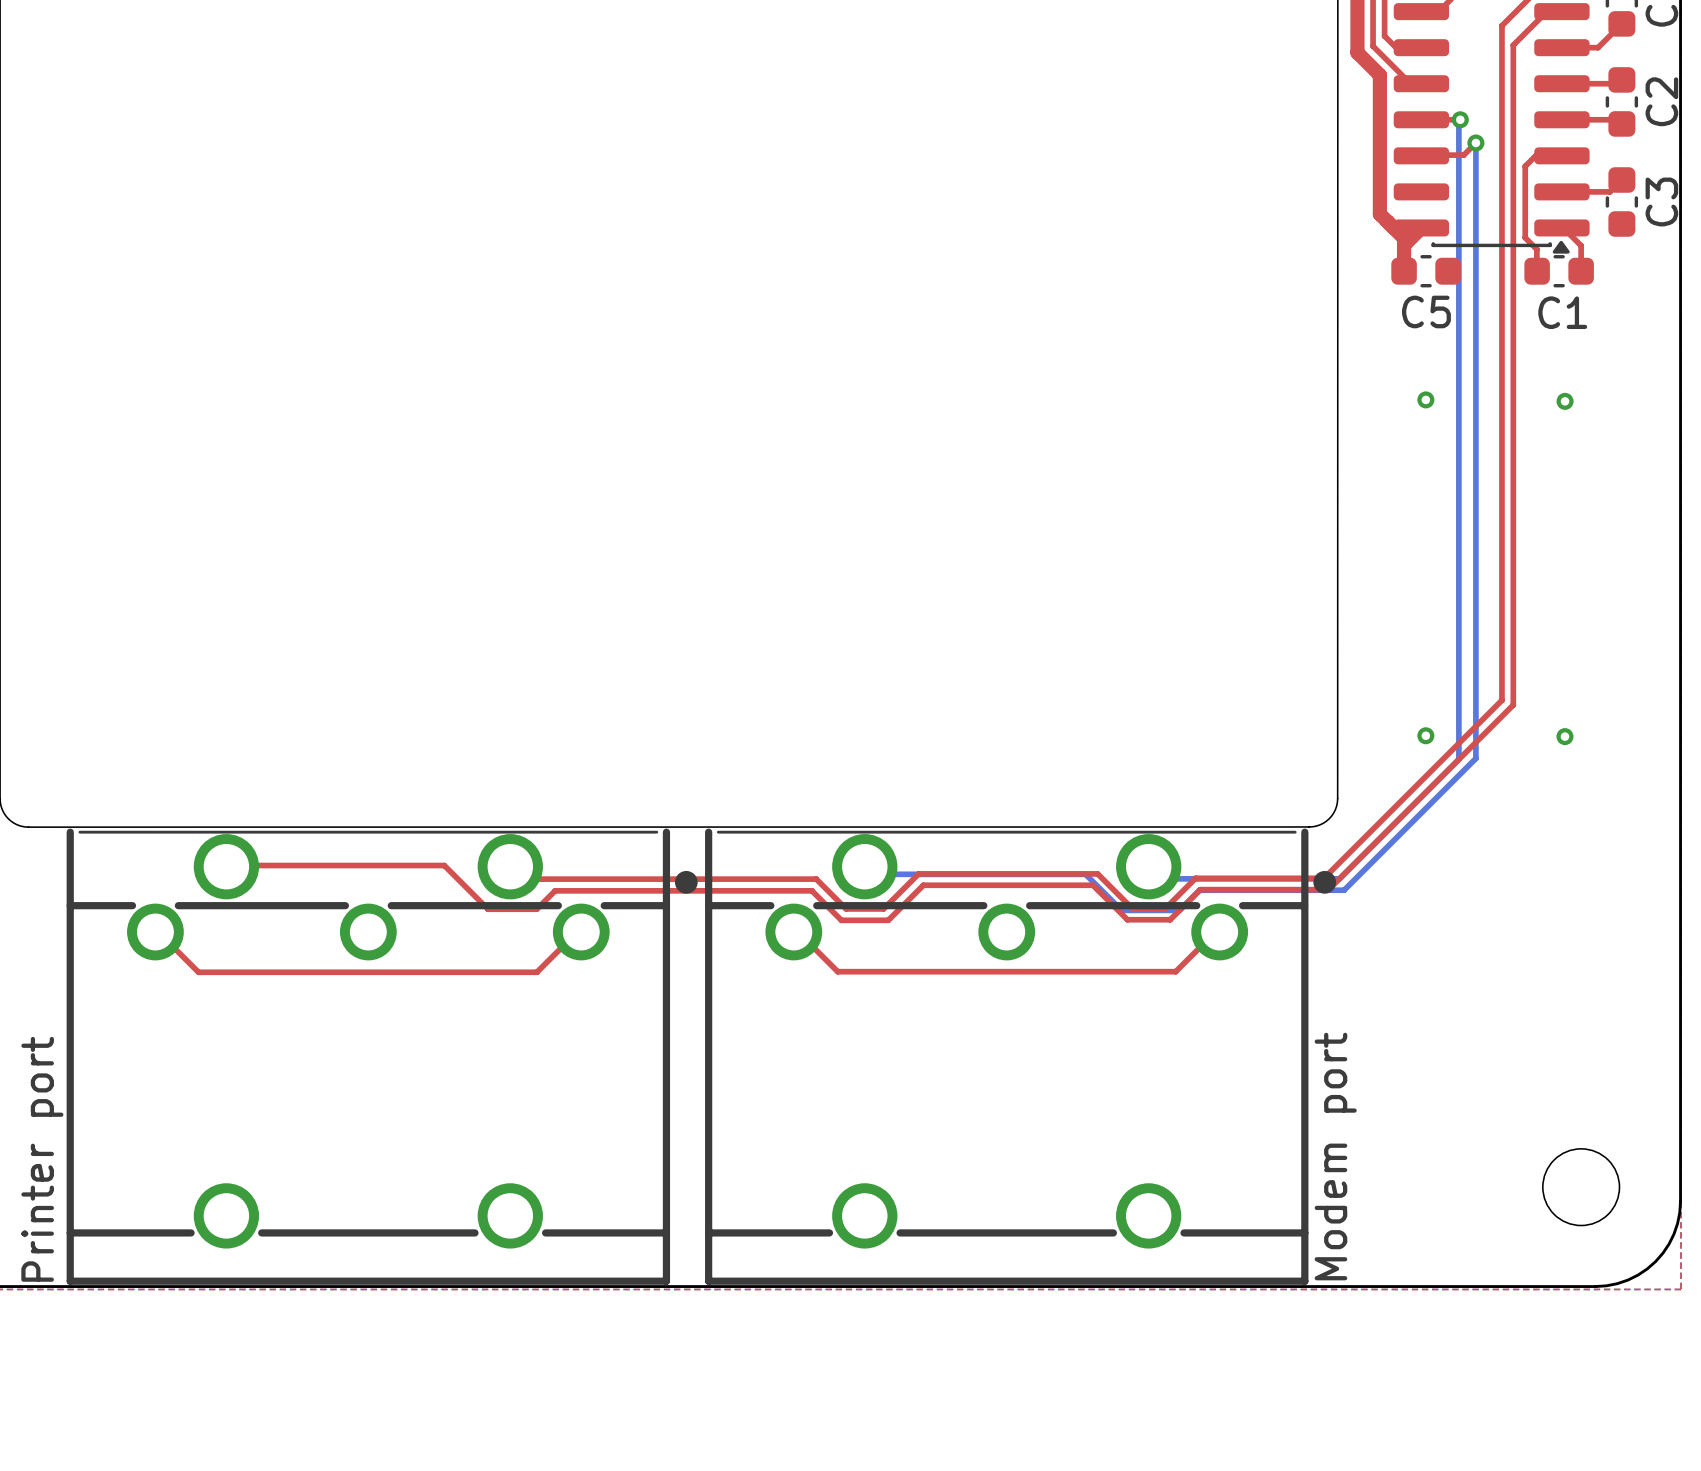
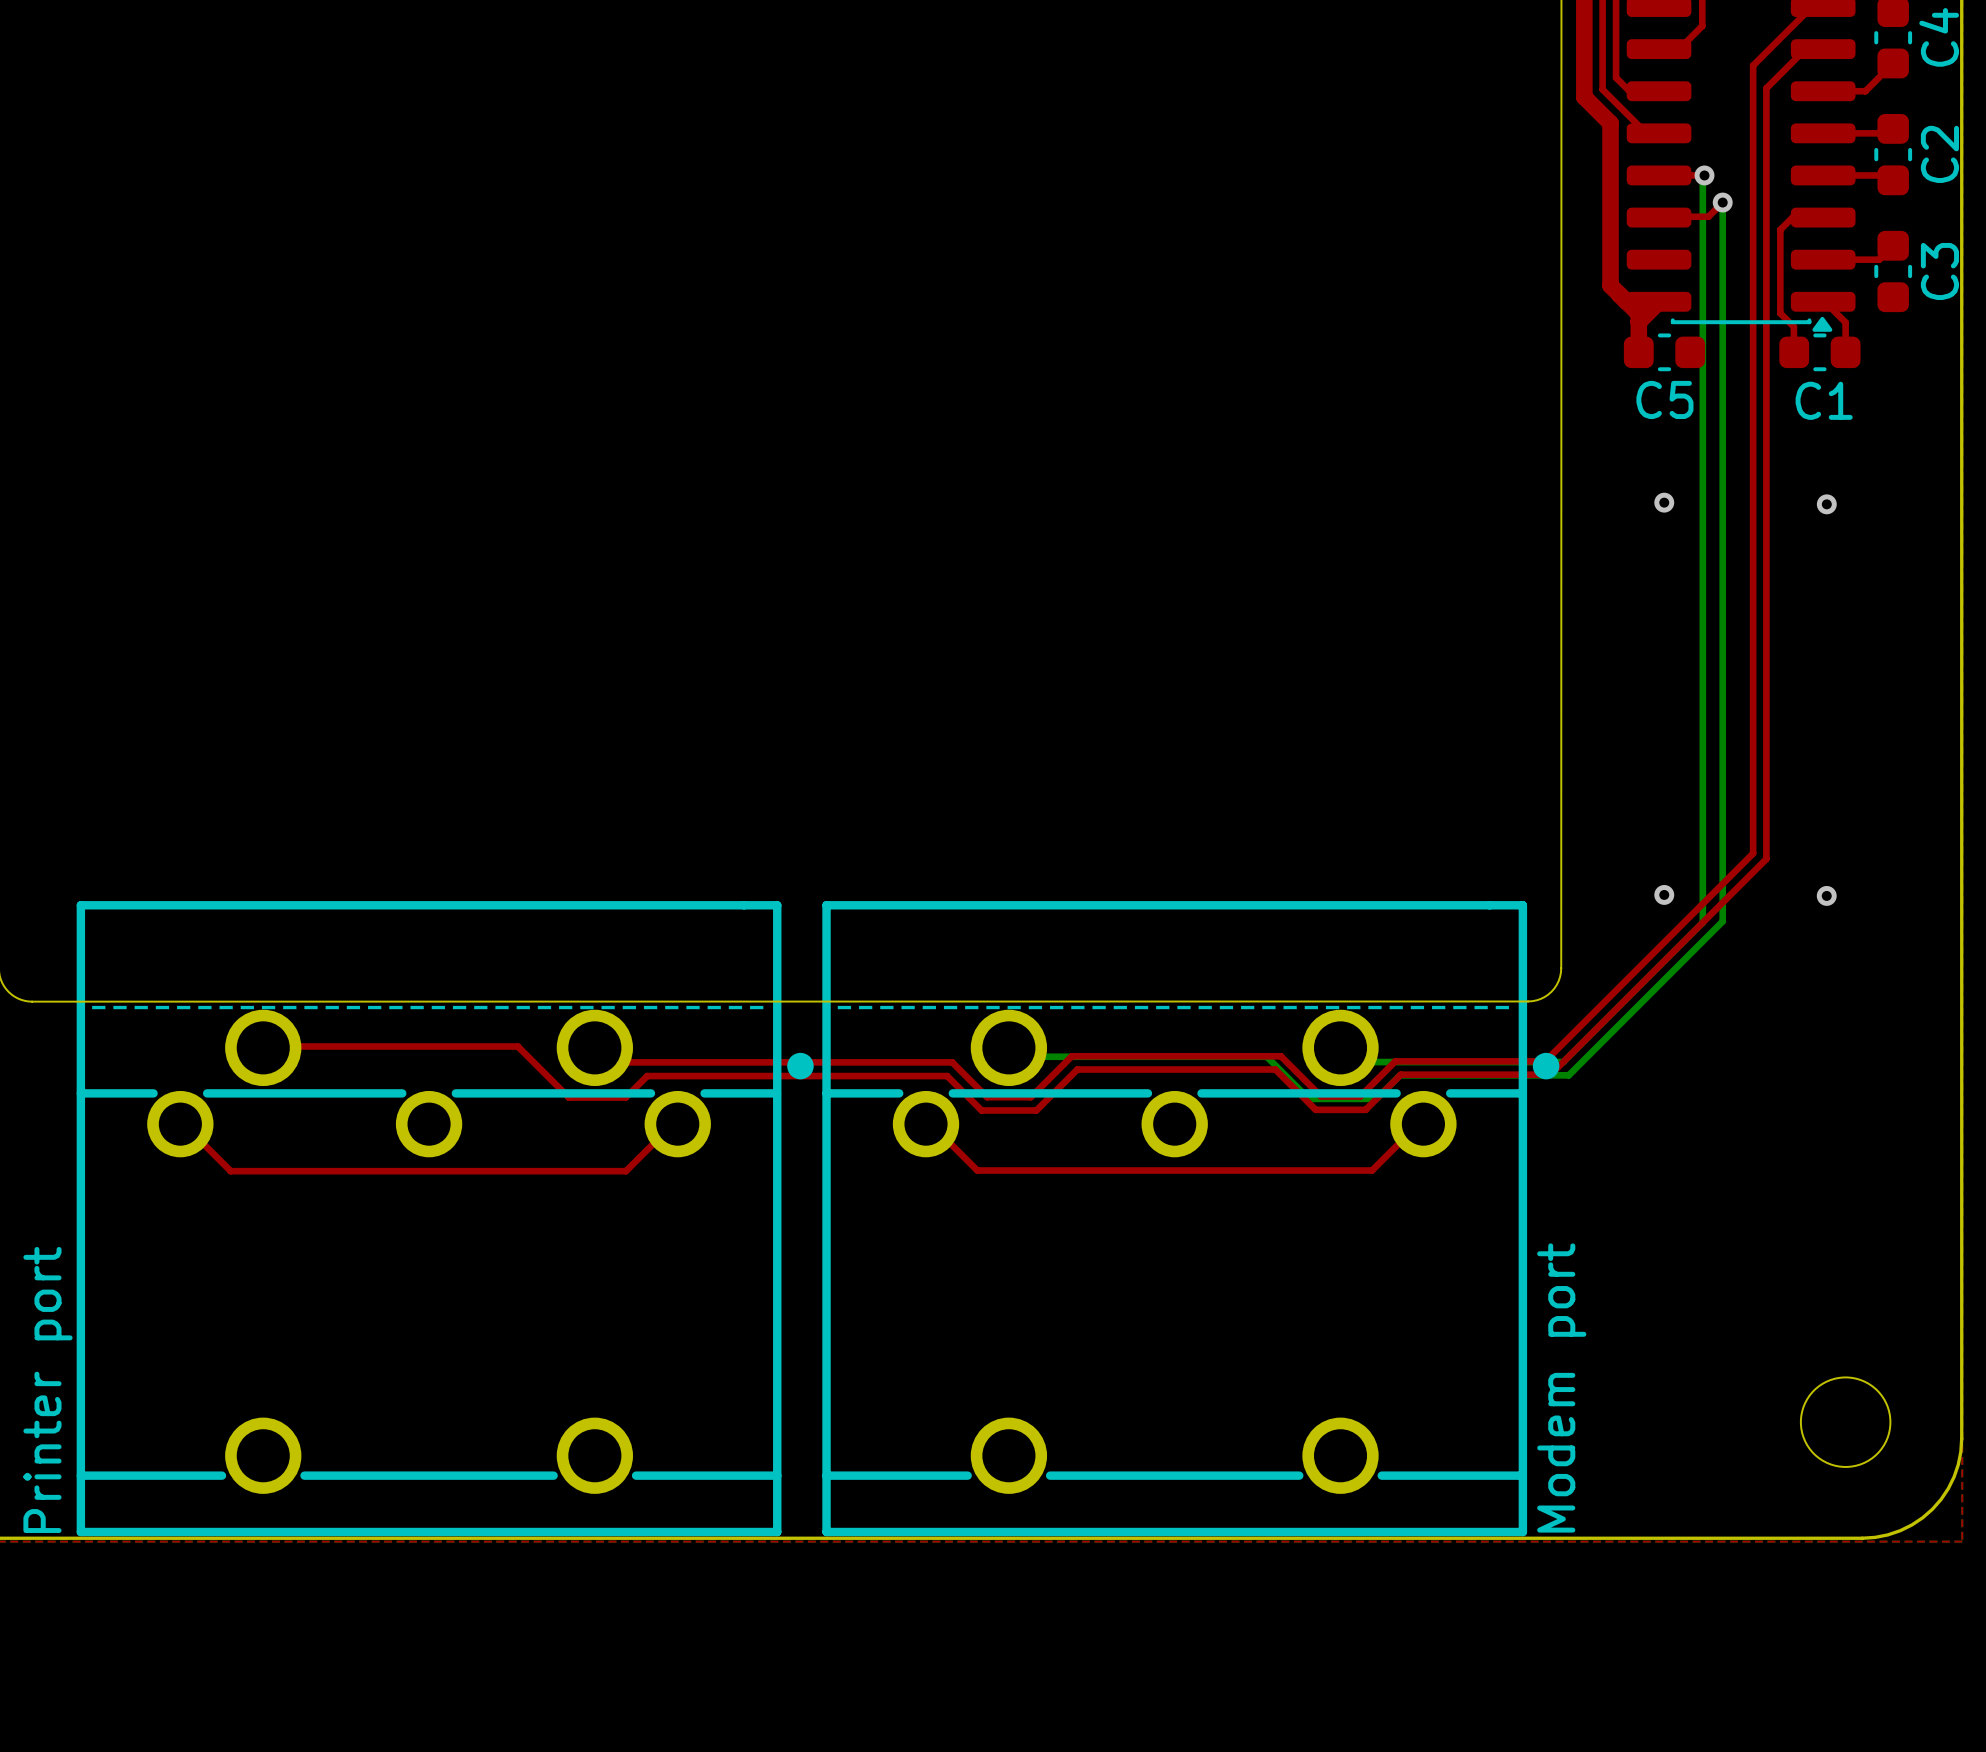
part: none -> Printer port (445, 1218)
part: none -> Modem port (1190, 1218)
part: Printer port (382, 1056) -> none
part: Modem port (1020, 1056) -> none

